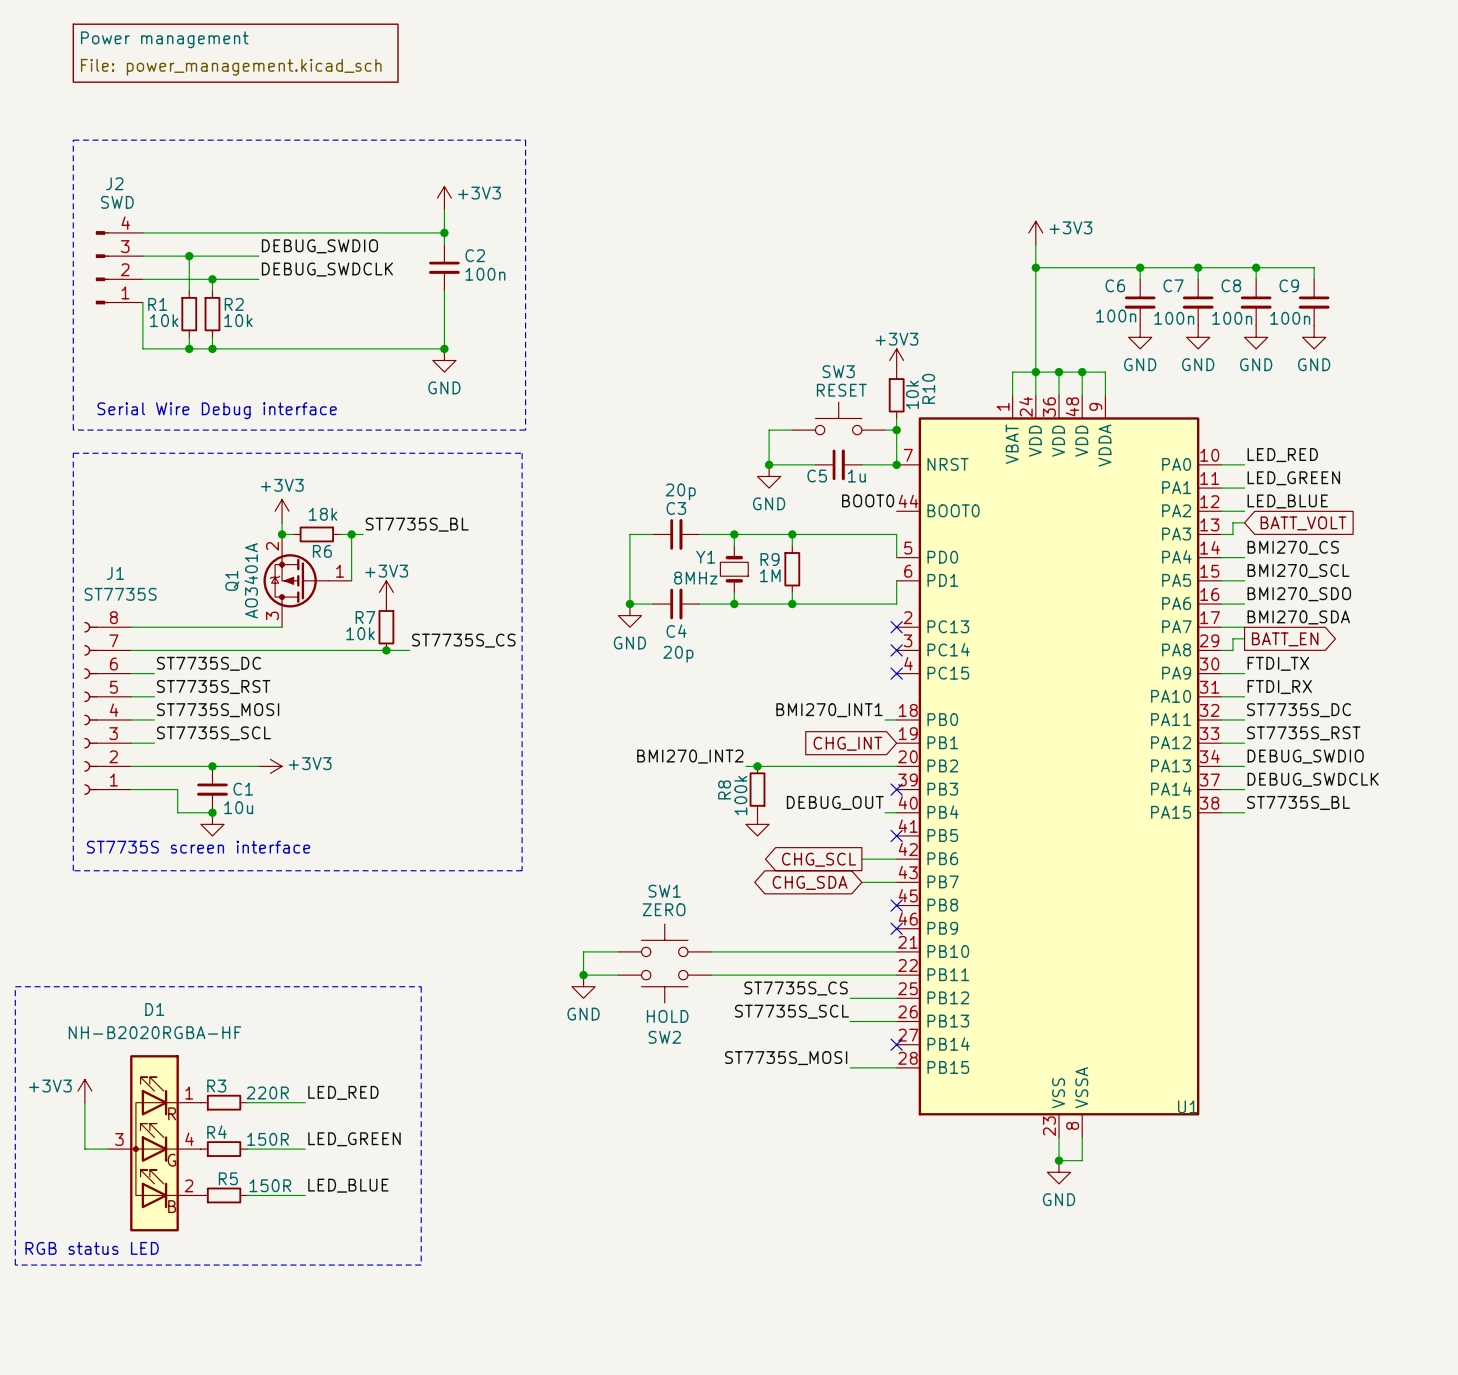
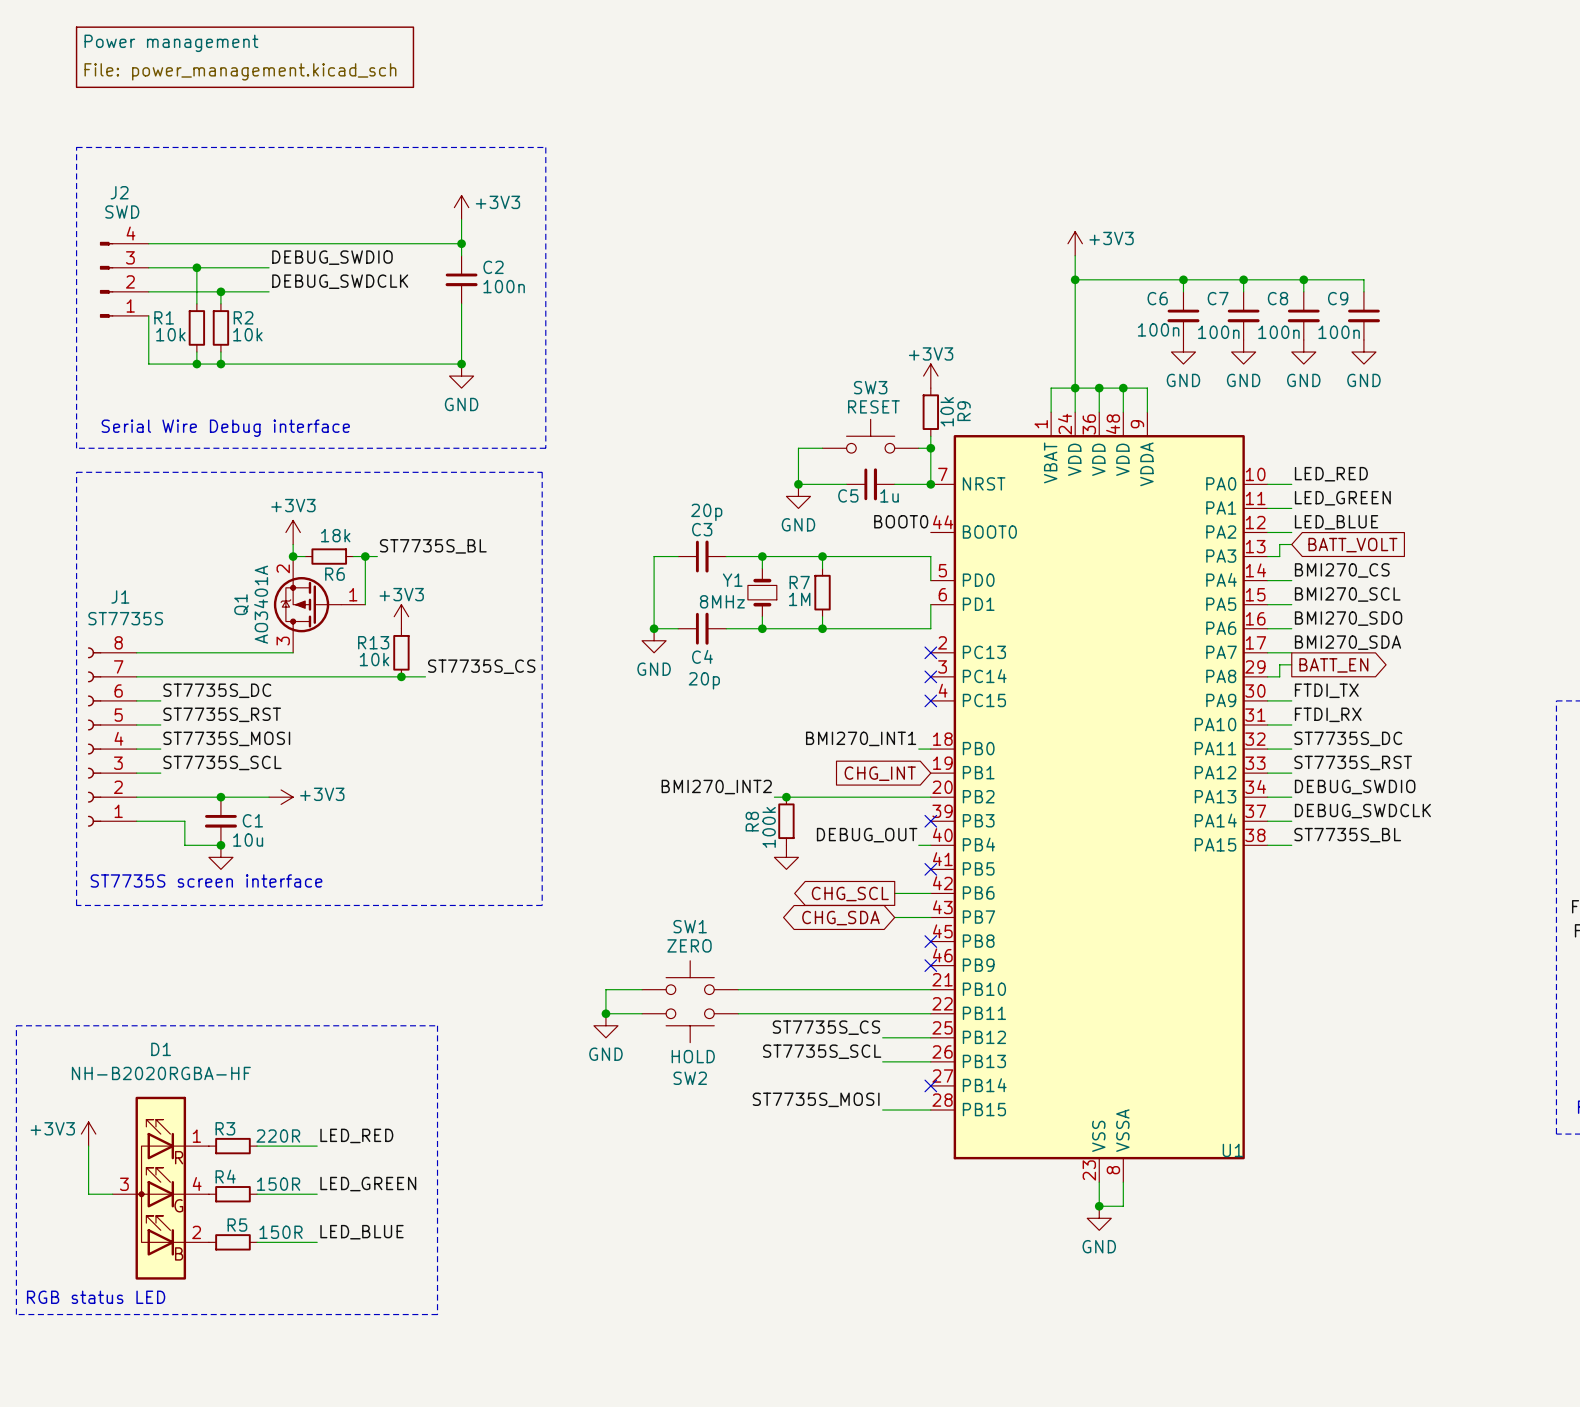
R10 name: R10 (928, 388) -> R9 (964, 411)
R9 name: R9 (770, 559) -> R7 (799, 582)
R7 name: R7 (365, 617) -> R13 (373, 642)

